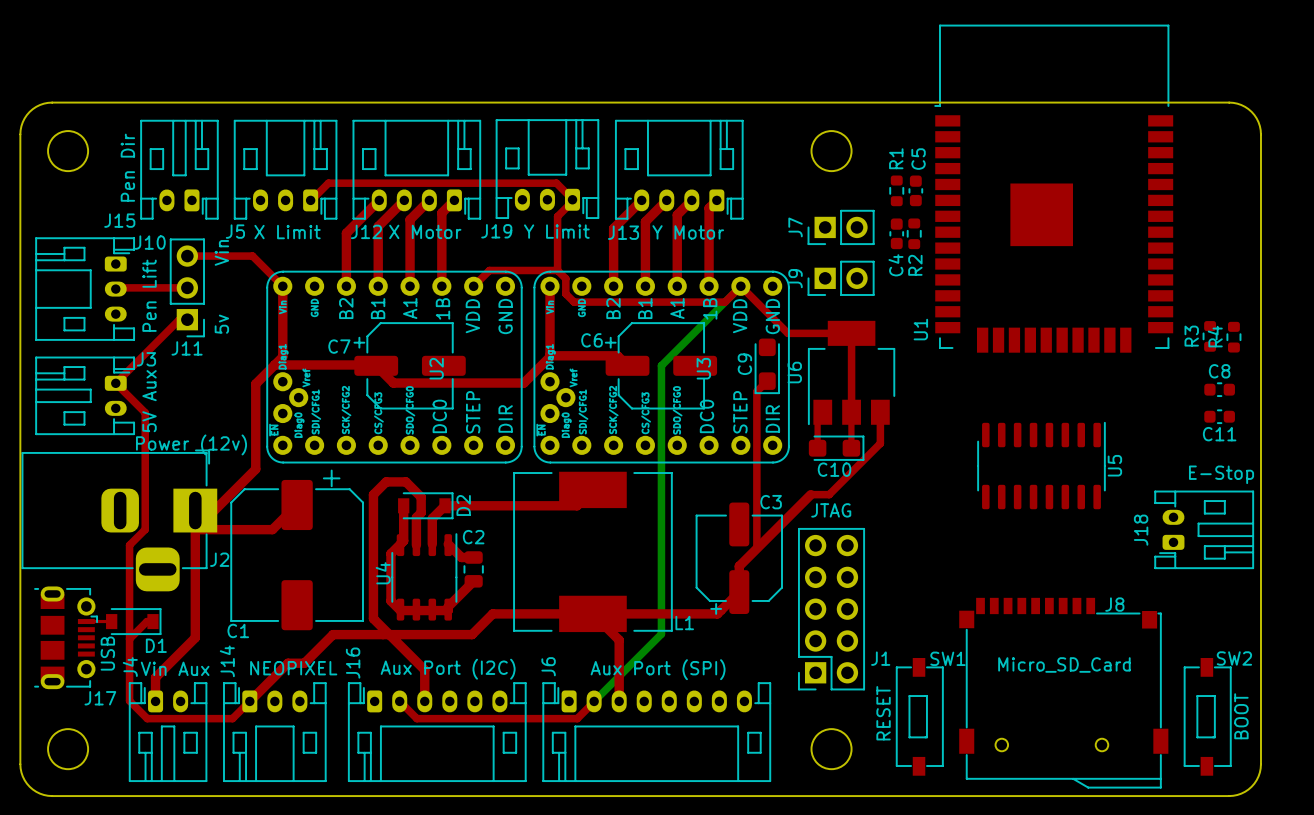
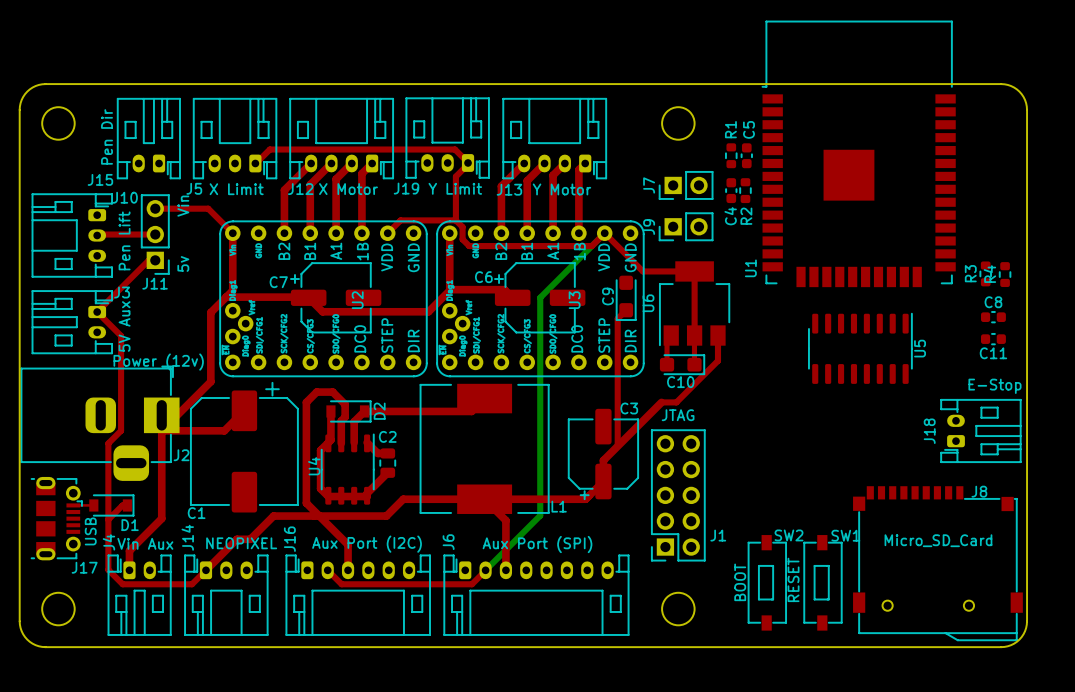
U5 position: (1041, 465) -> (860, 348)
J8 position: (1063, 693) -> (937, 563)
SW1 position: (919, 716) -> (822, 582)
SW2 position: (1207, 716) -> (767, 582)
SW2 value position: BOOT (1241, 716) -> BOOT (740, 582)

